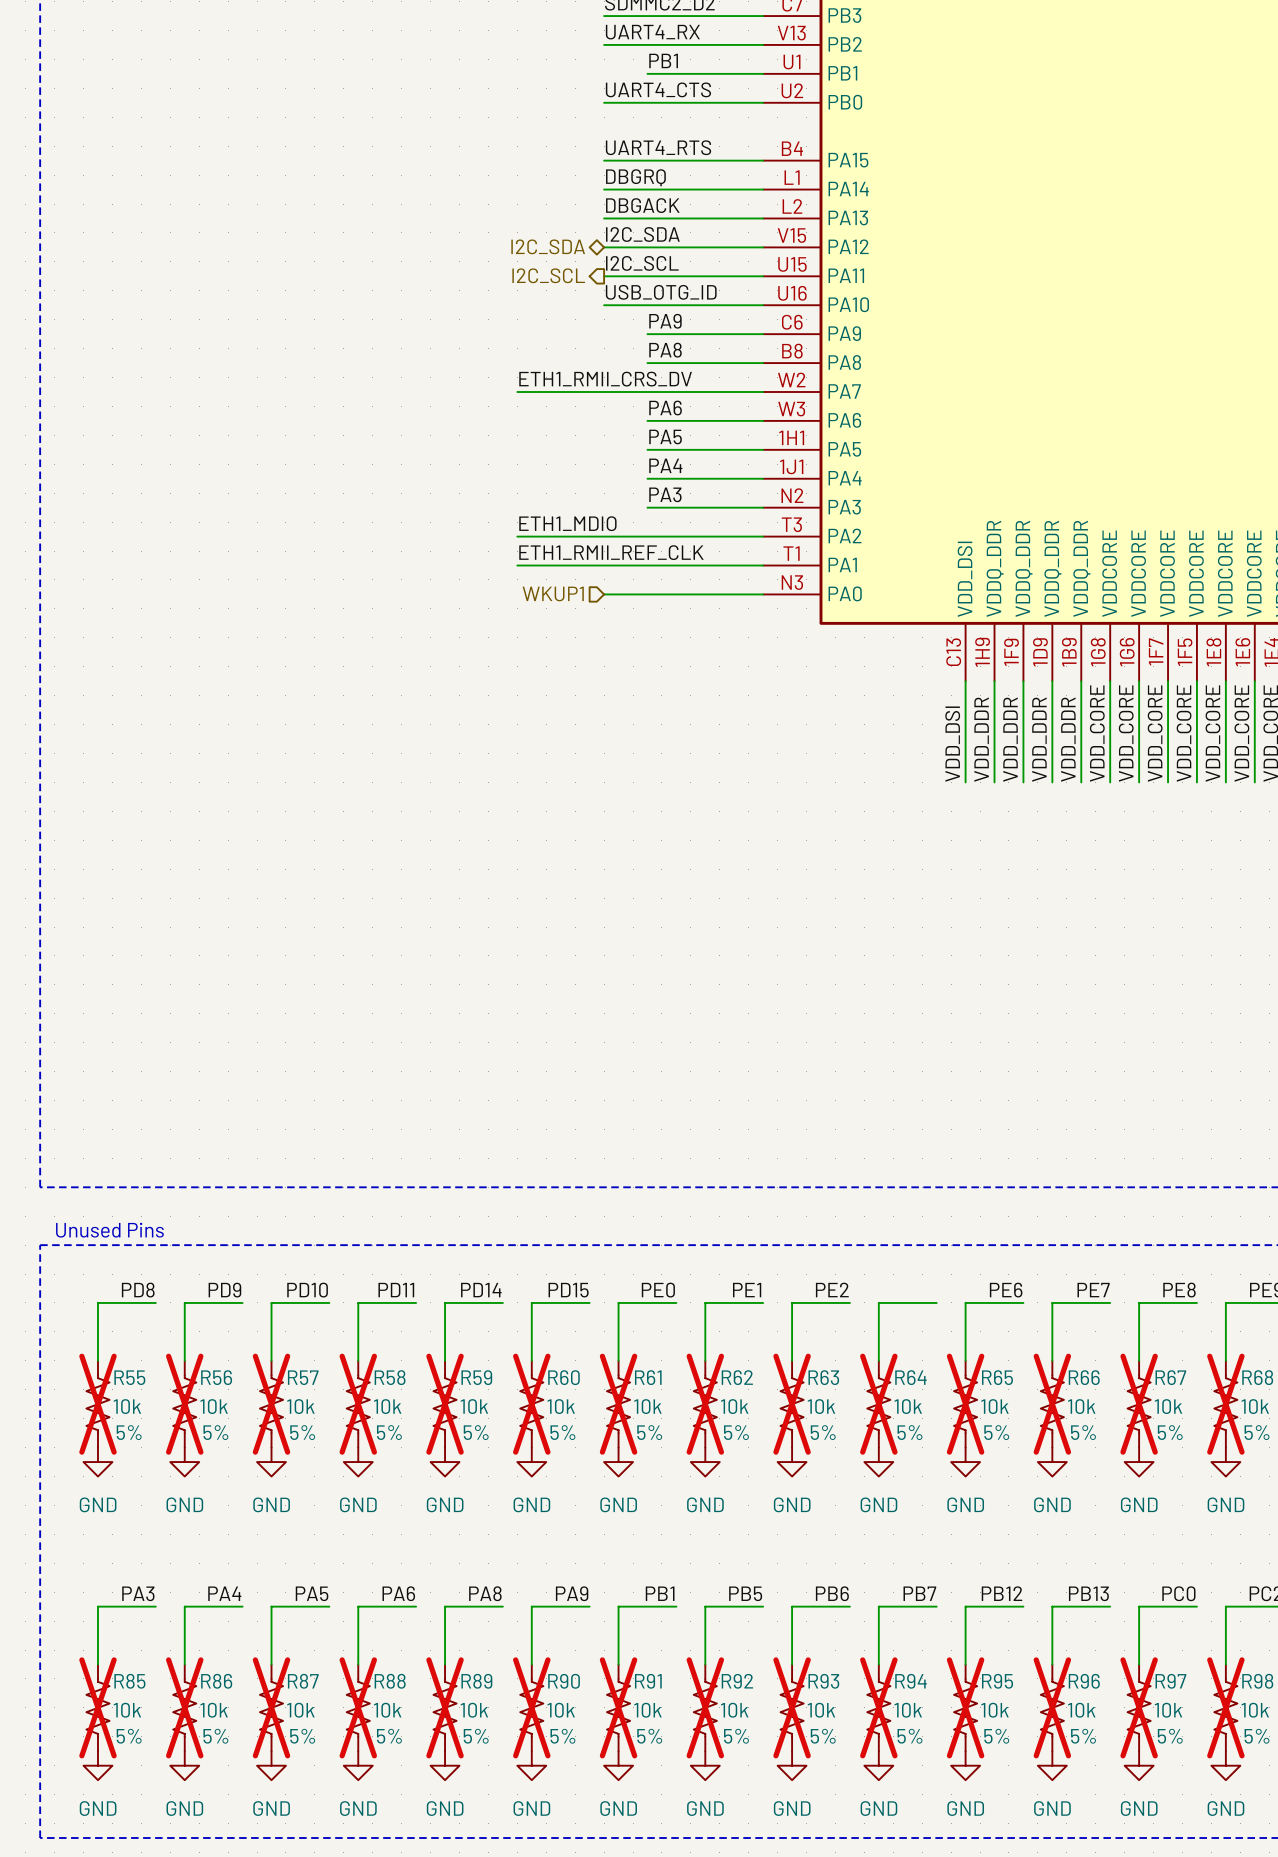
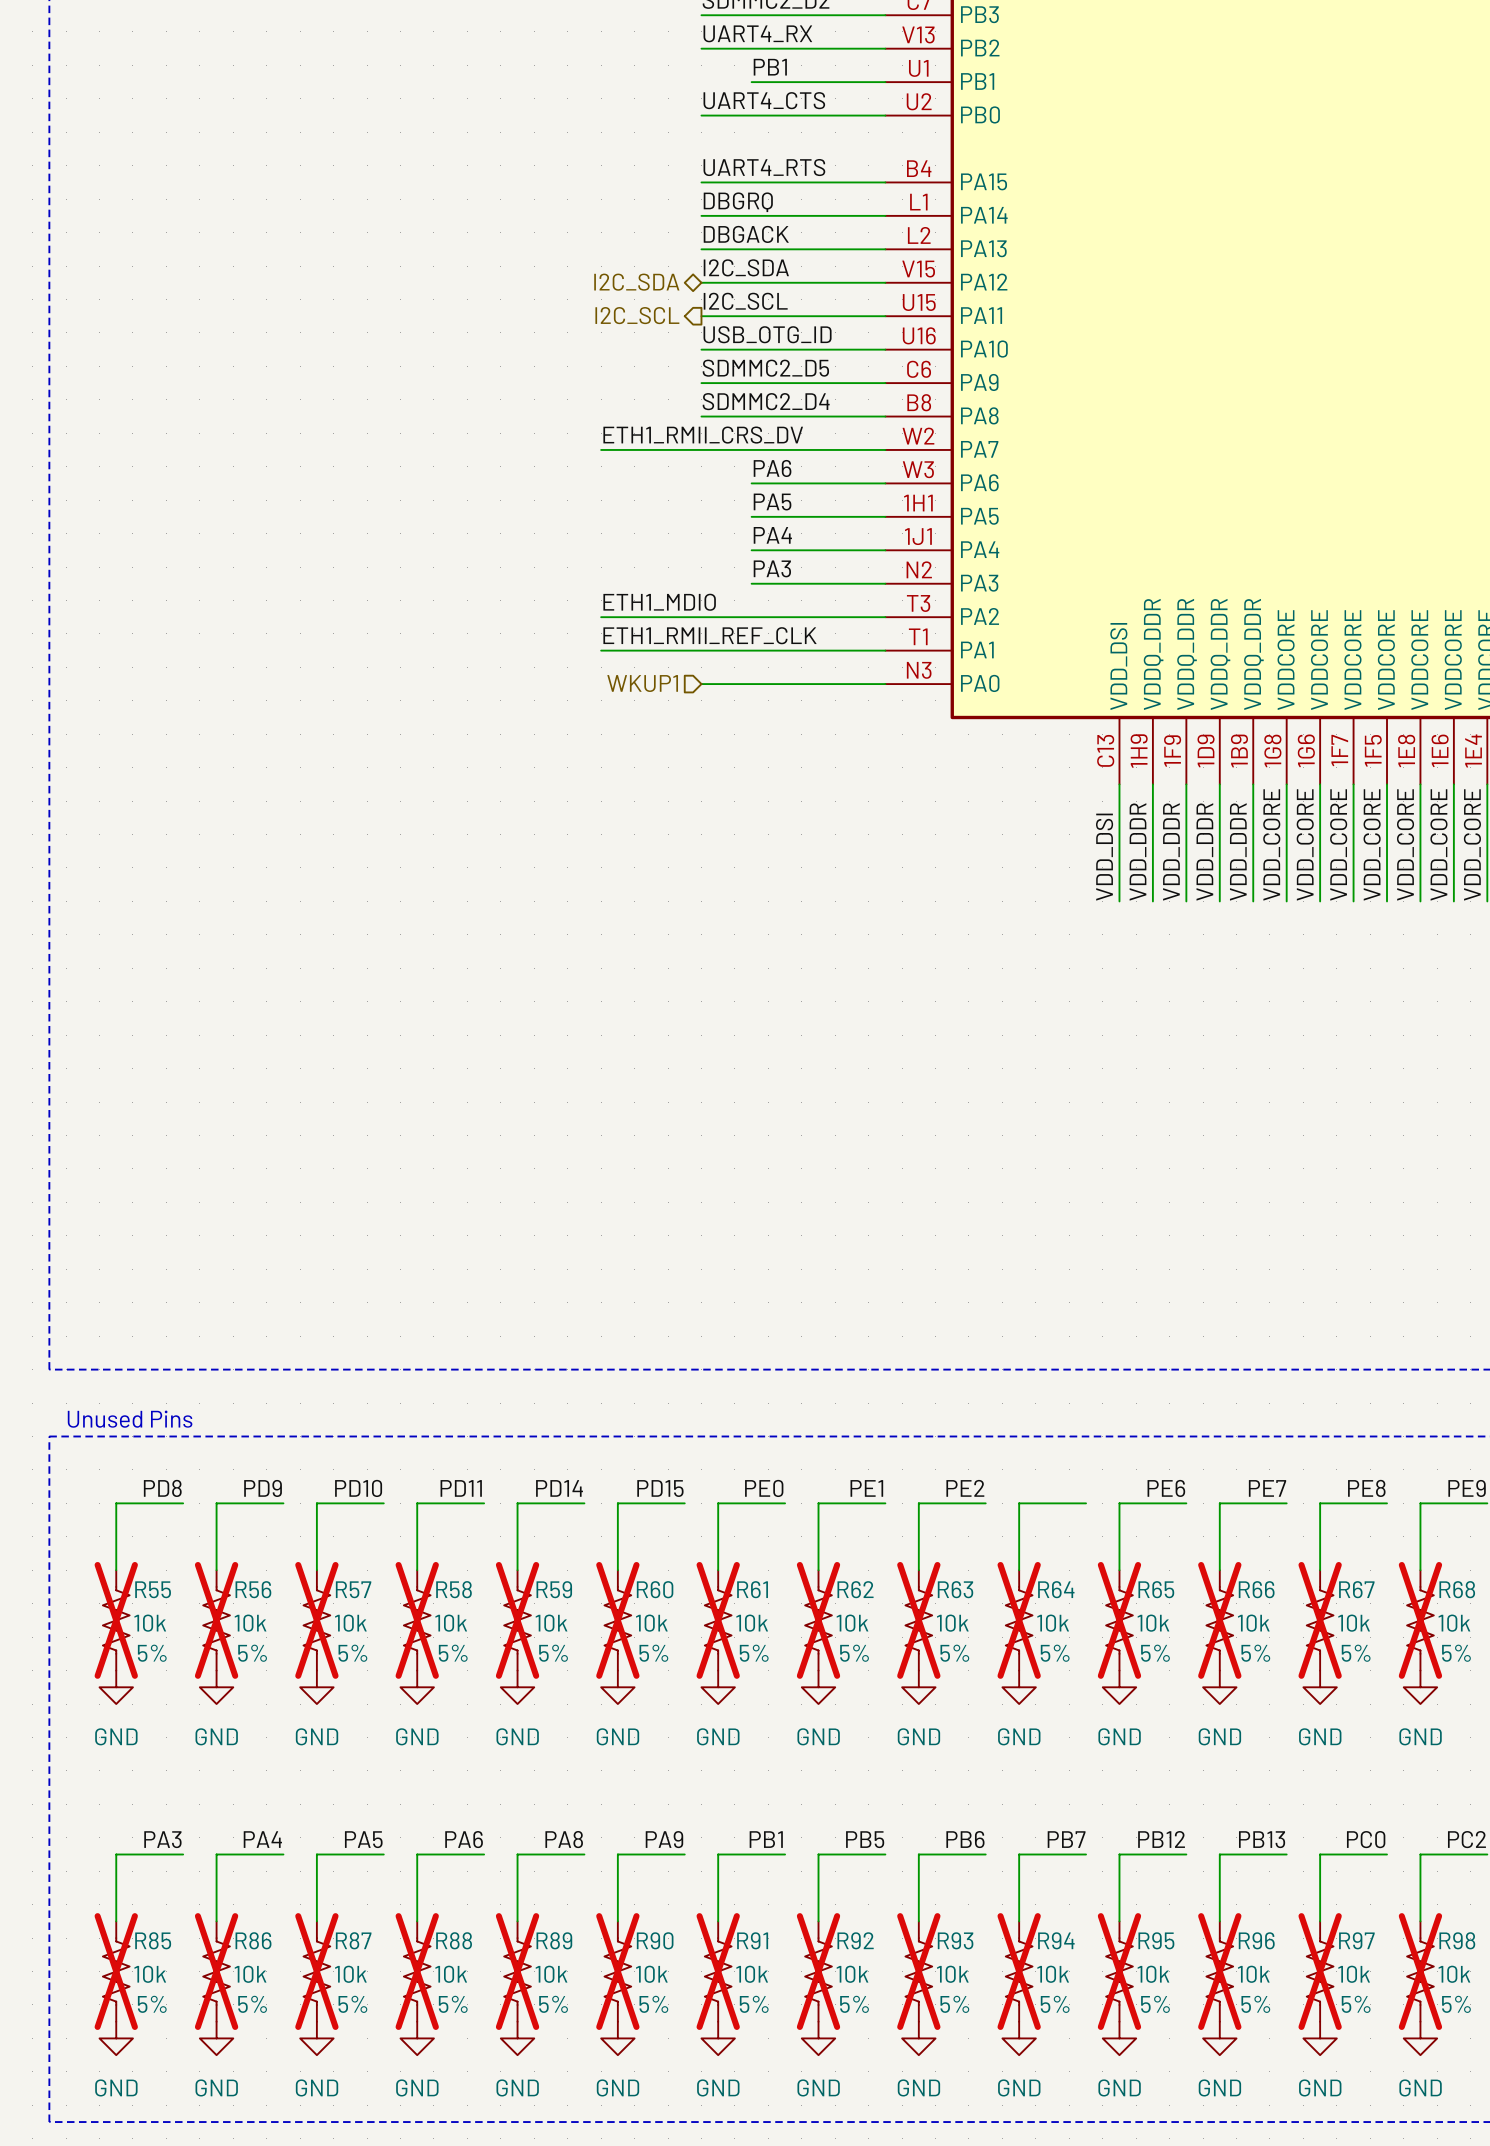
label: none -> SDMMC2_D5 (765, 368)
label: PA9 (665, 321) -> none
wire: none -> (701, 383) (751, 383)
label: none -> SDMMC2_D4 (766, 401)
label: PA8 (665, 350) -> none
wire: none -> (701, 416) (751, 416)

